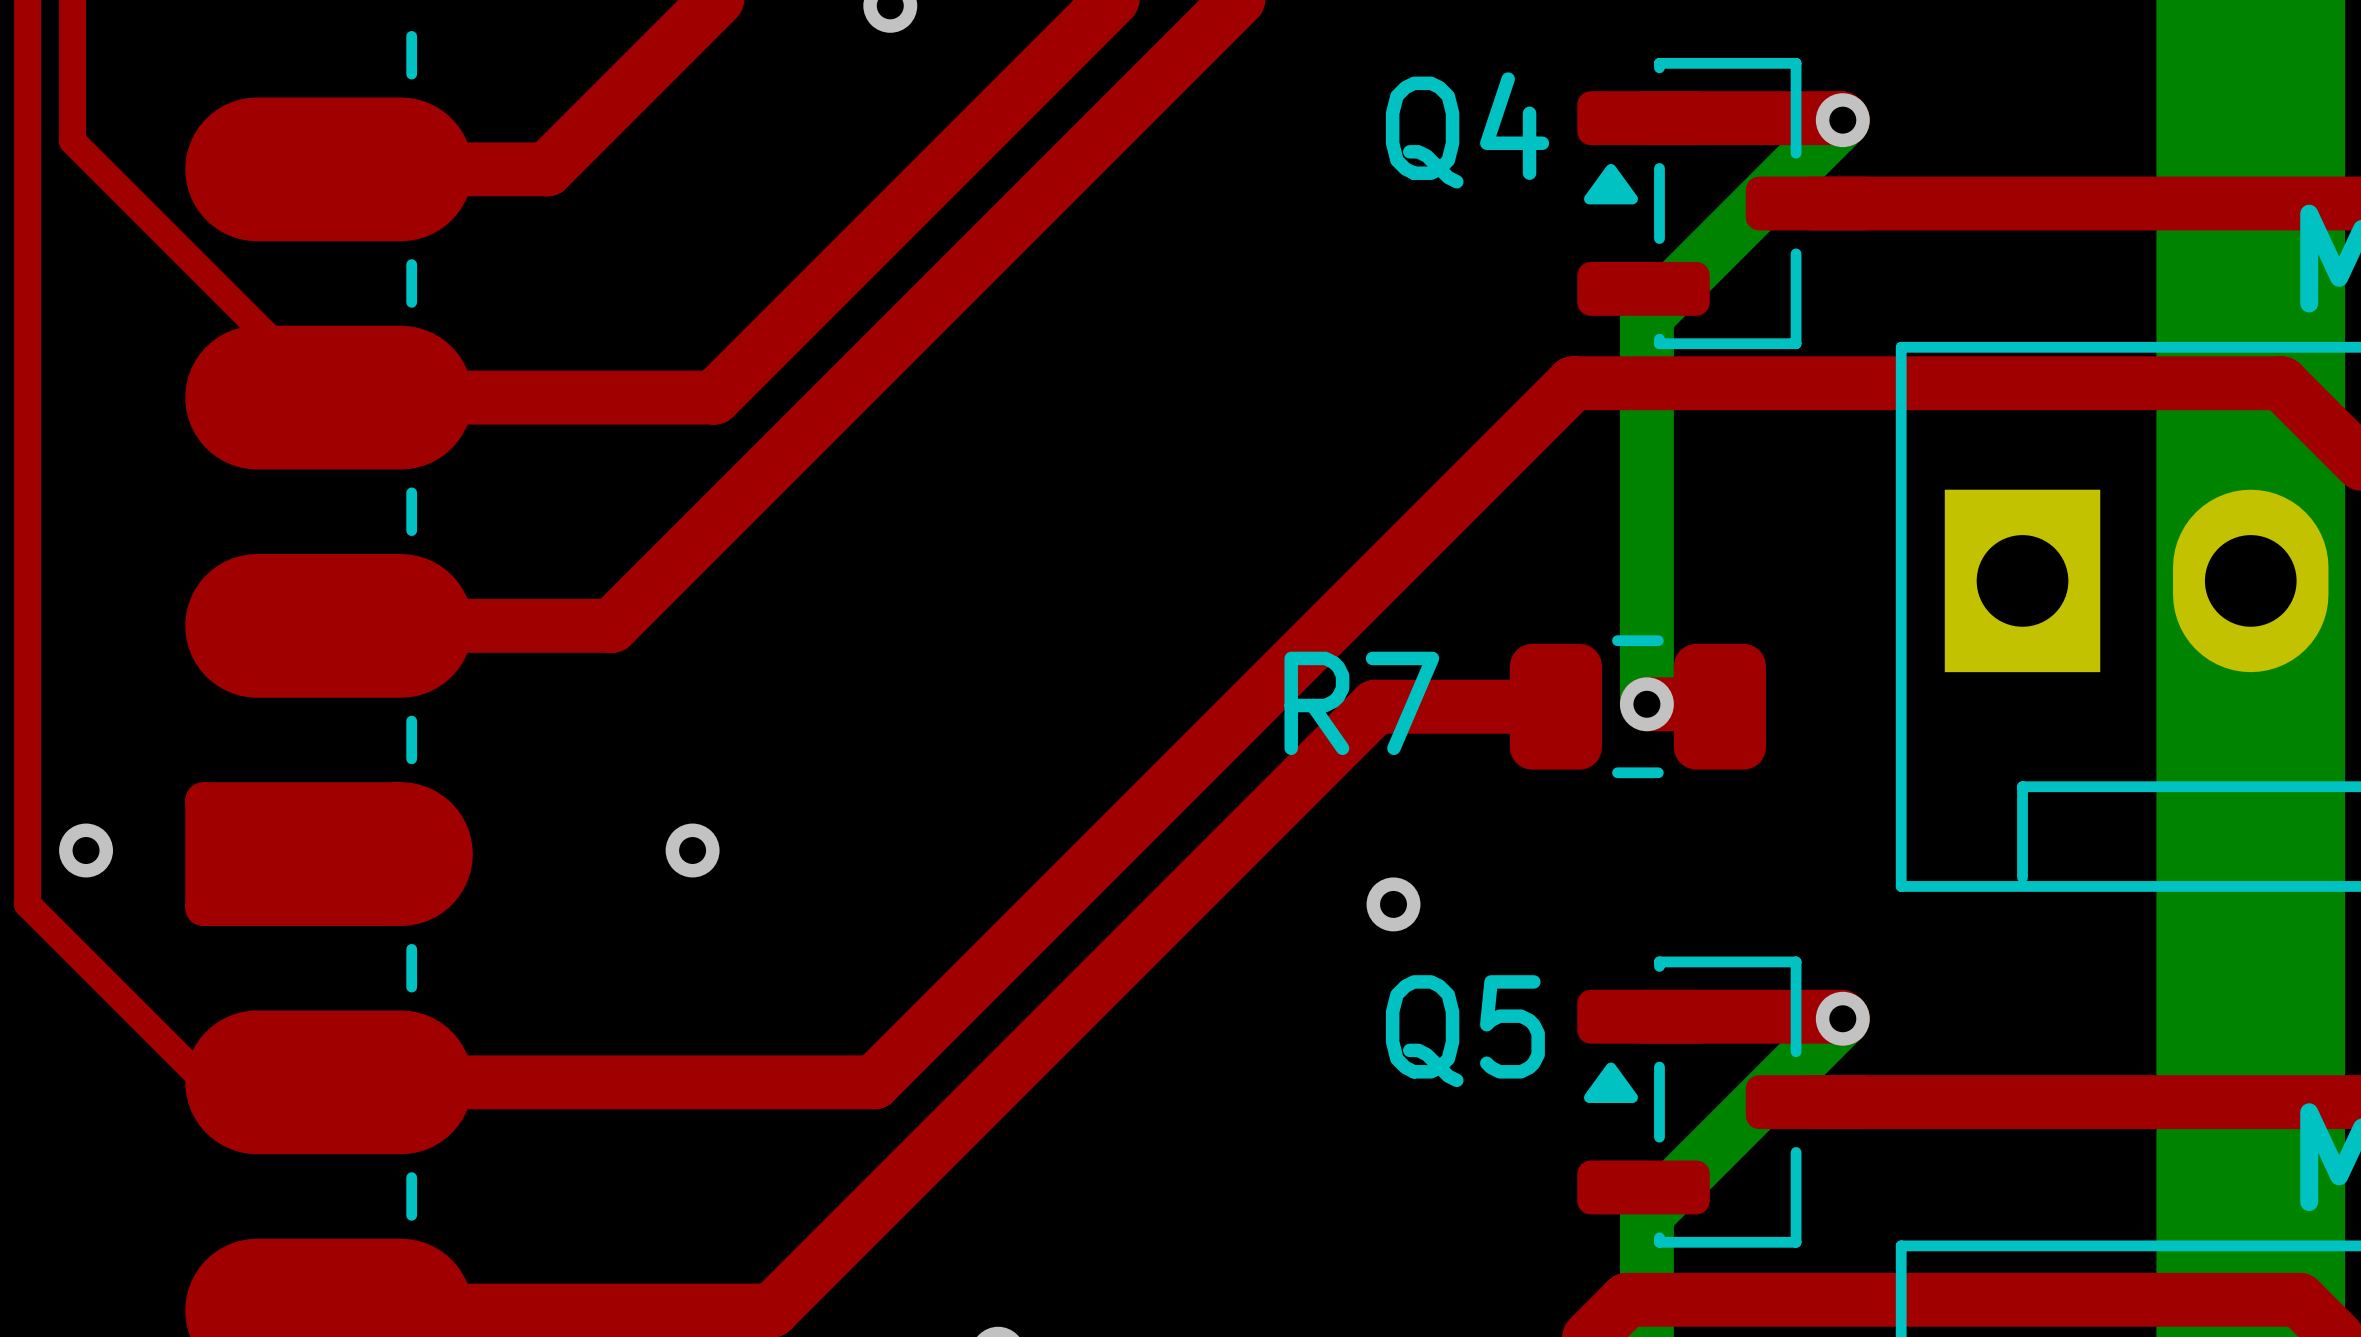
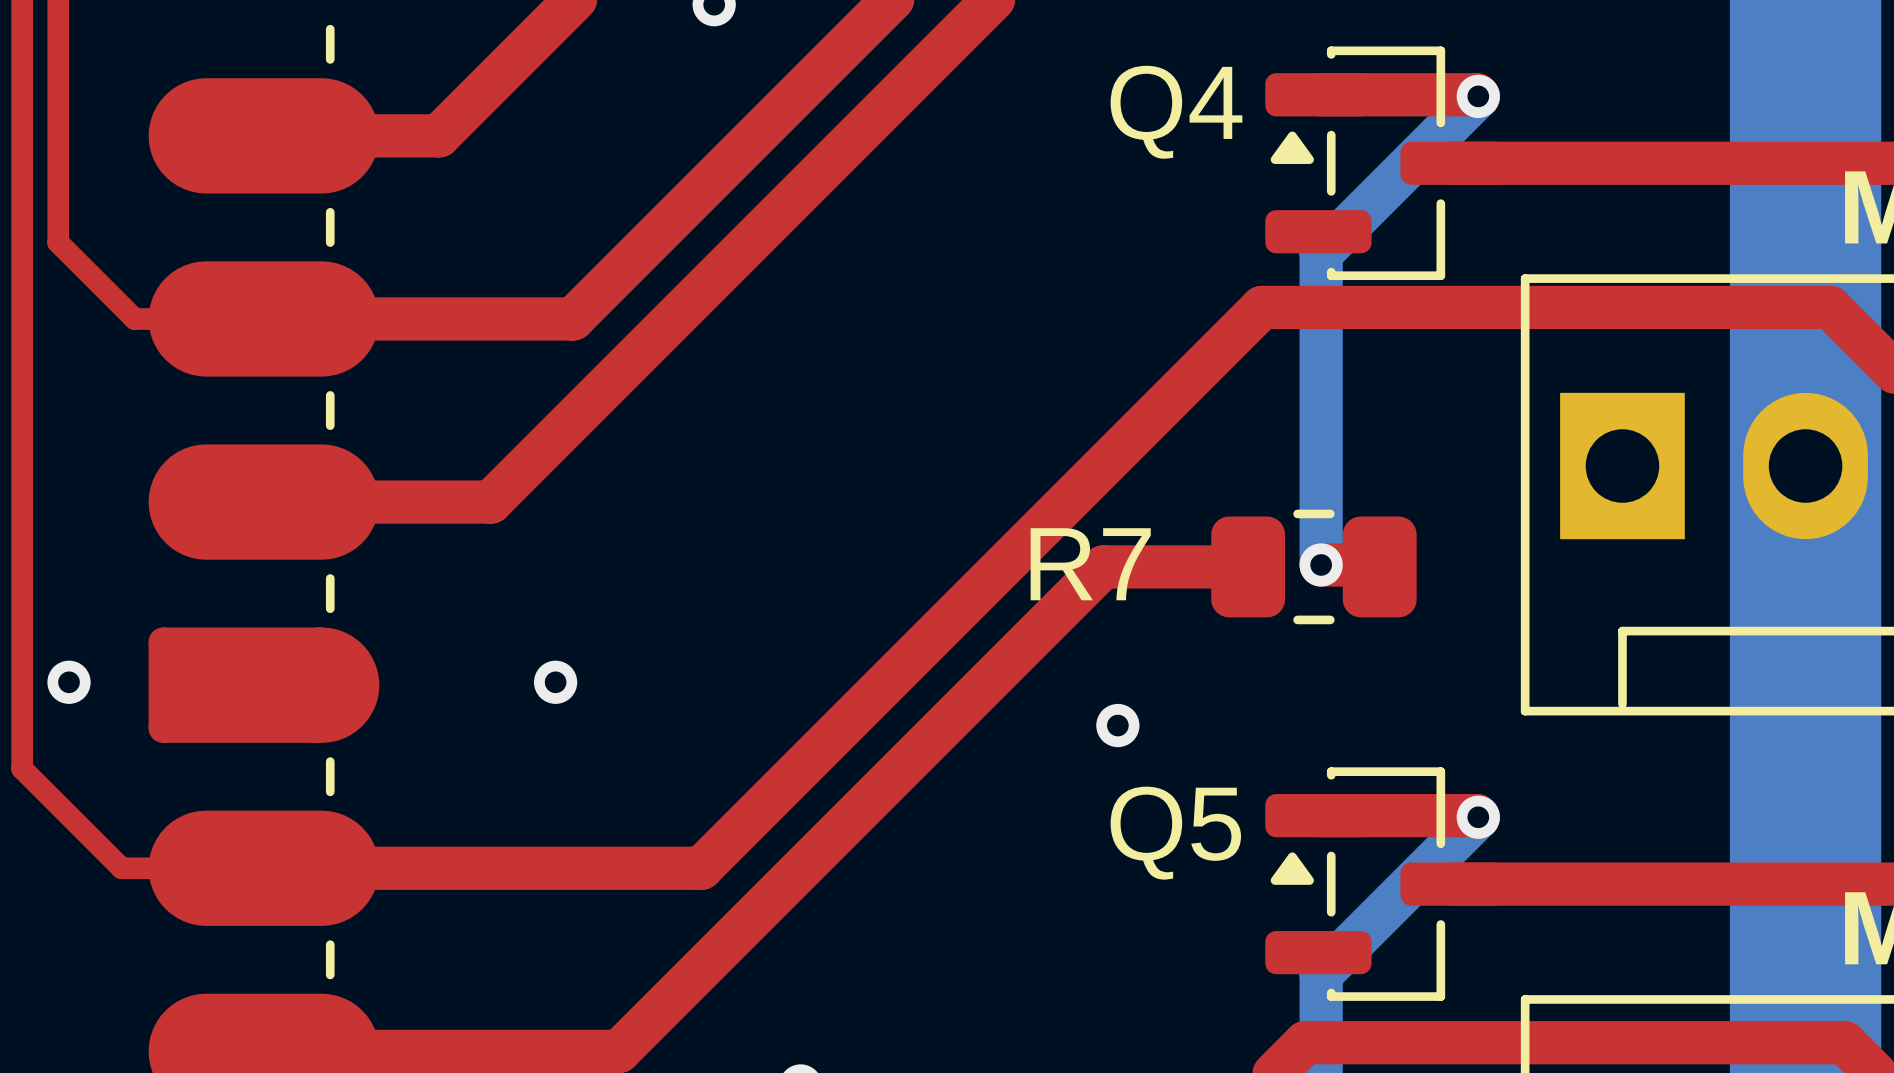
top track: (72, 141) (329, 397) -> (58, 113) (58, 242) (134, 318) (263, 318)
top track: (27, 904) (205, 1082) -> (22, 725) (22, 768) (121, 868) (164, 868)

